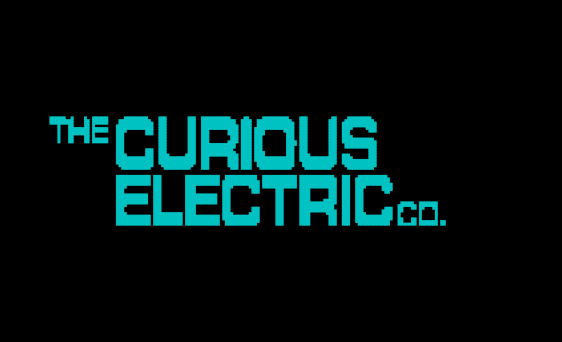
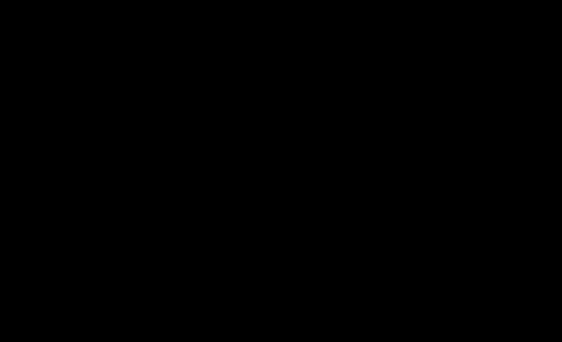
drawing: [49, 116, 446, 226] -> none

